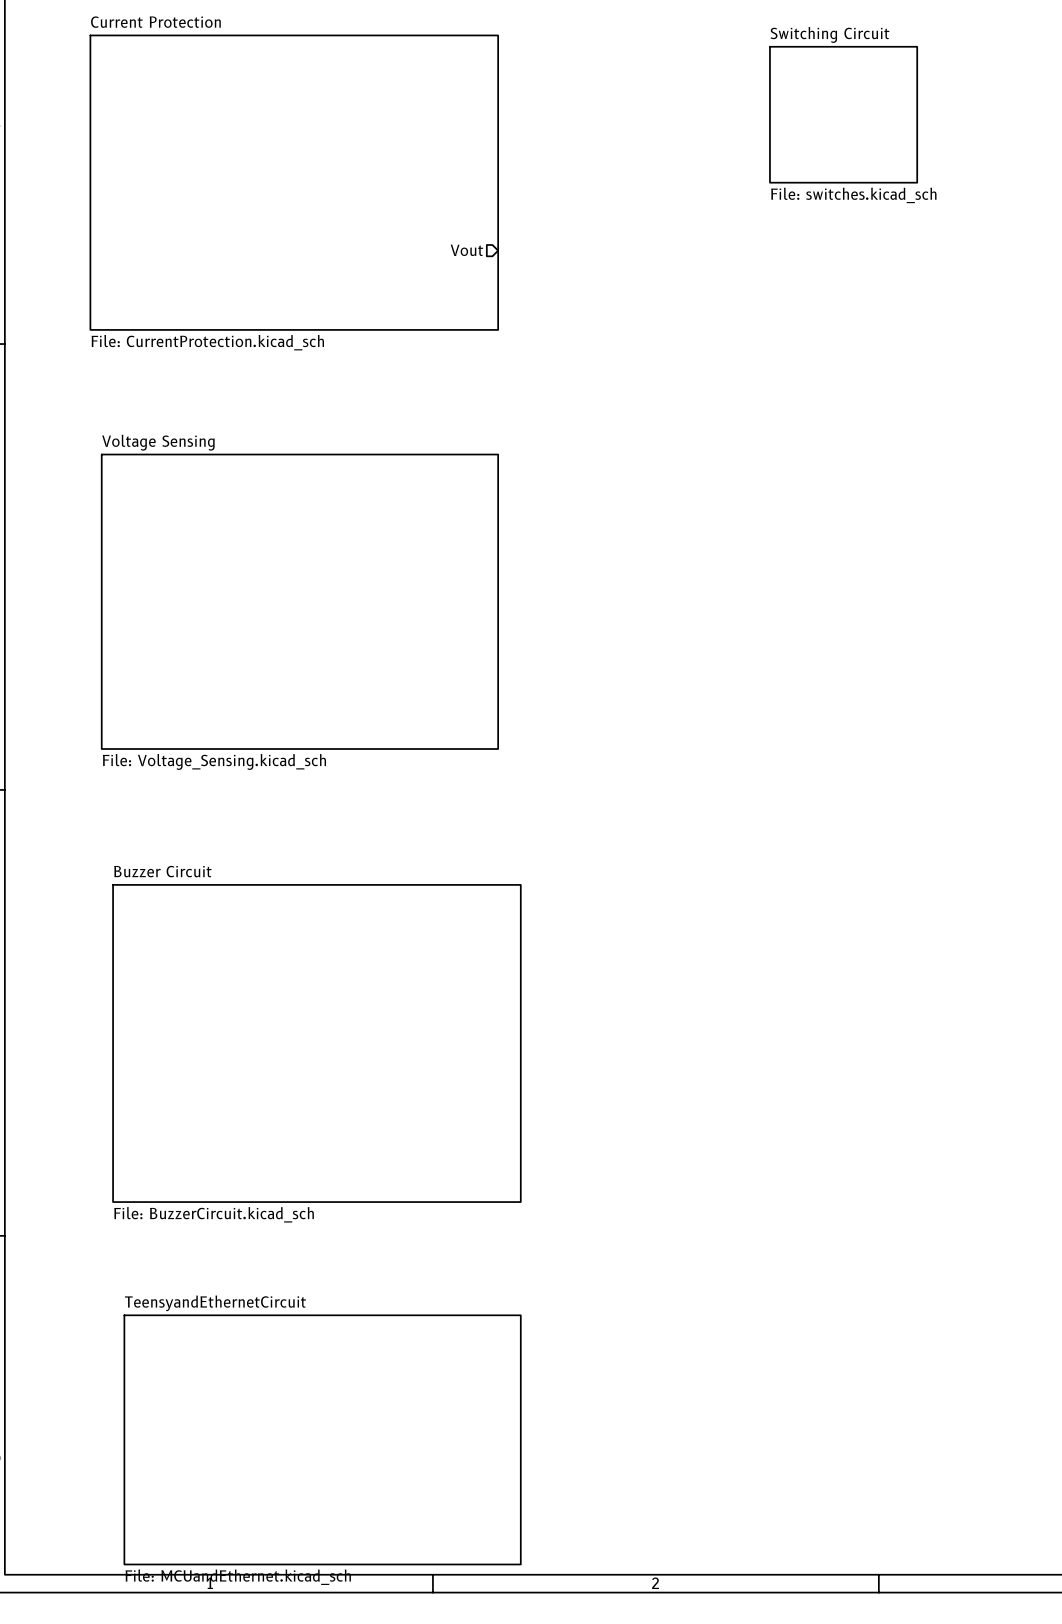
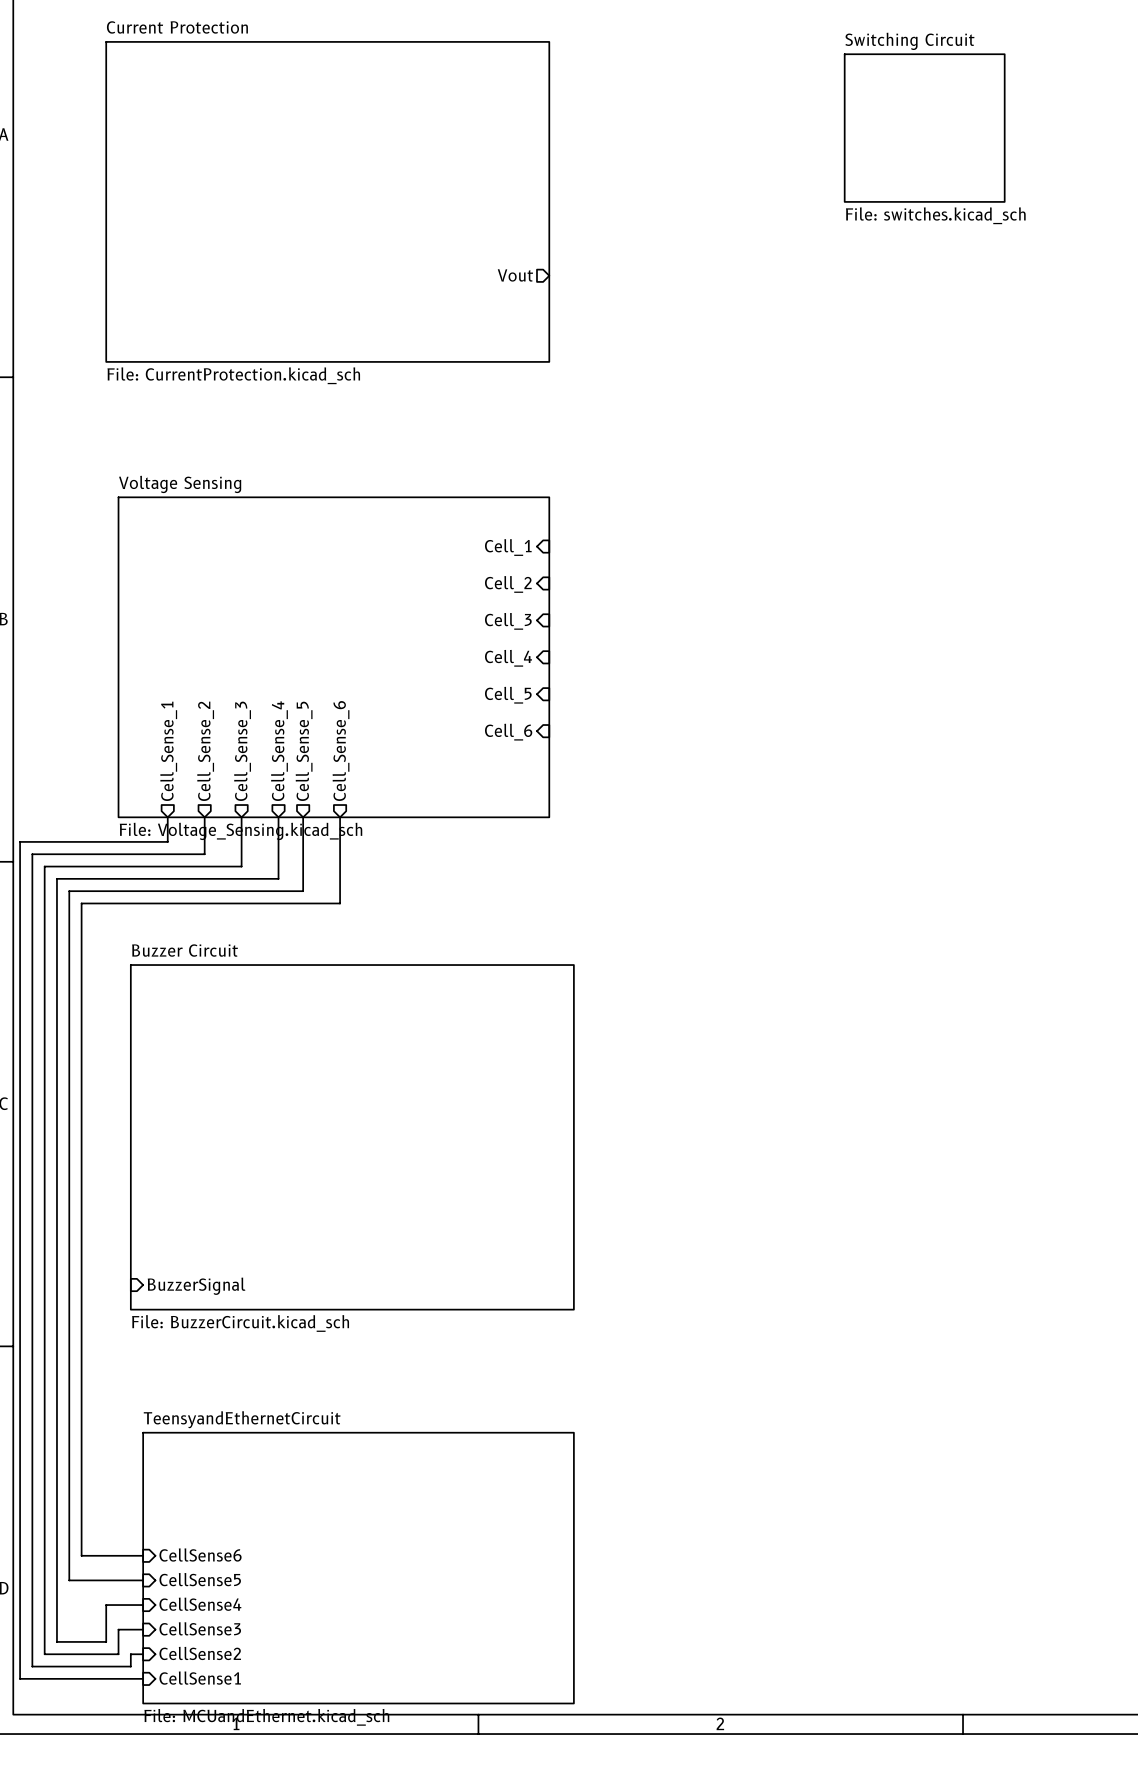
sheet pin: none -> Cell_1 (508, 547)
sheet pin: none -> Cell_2 (508, 584)
sheet pin: none -> Cell_3 (508, 621)
sheet pin: none -> Cell_4 (508, 658)
sheet pin: none -> Cell_5 (508, 695)
sheet pin: none -> Cell_6 (508, 732)
sheet pin: none -> Cell_Sense_6 (341, 751)
sheet pin: none -> Cell_Sense_1 (168, 751)
sheet pin: none -> Cell_Sense_2 (205, 751)
sheet pin: none -> Cell_Sense_3 (242, 751)
sheet pin: none -> Cell_Sense_4 (279, 751)
sheet pin: none -> Cell_Sense_5 (304, 751)
wire: none -> (167, 817) (167, 841) (20, 841) (20, 1678) (143, 1678)
wire: none -> (204, 817) (204, 854) (32, 854) (32, 1666) (130, 1666) (130, 1654) (143, 1654)
wire: none -> (241, 817) (241, 866) (44, 866) (44, 1654) (118, 1654) (118, 1629) (143, 1629)
wire: none -> (278, 817) (278, 878) (56, 878) (56, 1641) (106, 1641) (106, 1605) (143, 1605)
wire: none -> (303, 817) (303, 891) (69, 891) (69, 1580) (143, 1580)
wire: none -> (340, 817) (340, 903) (81, 903) (81, 1555) (143, 1555)
sheet pin: none -> BuzzerSignal (196, 1286)
sheet pin: none -> CellSense6 (200, 1555)
sheet pin: none -> CellSense5 (200, 1579)
sheet pin: none -> CellSense4 (200, 1604)
sheet pin: none -> CellSense3 (200, 1628)
sheet pin: none -> CellSense2 (200, 1653)
sheet pin: none -> CellSense1 (200, 1678)

